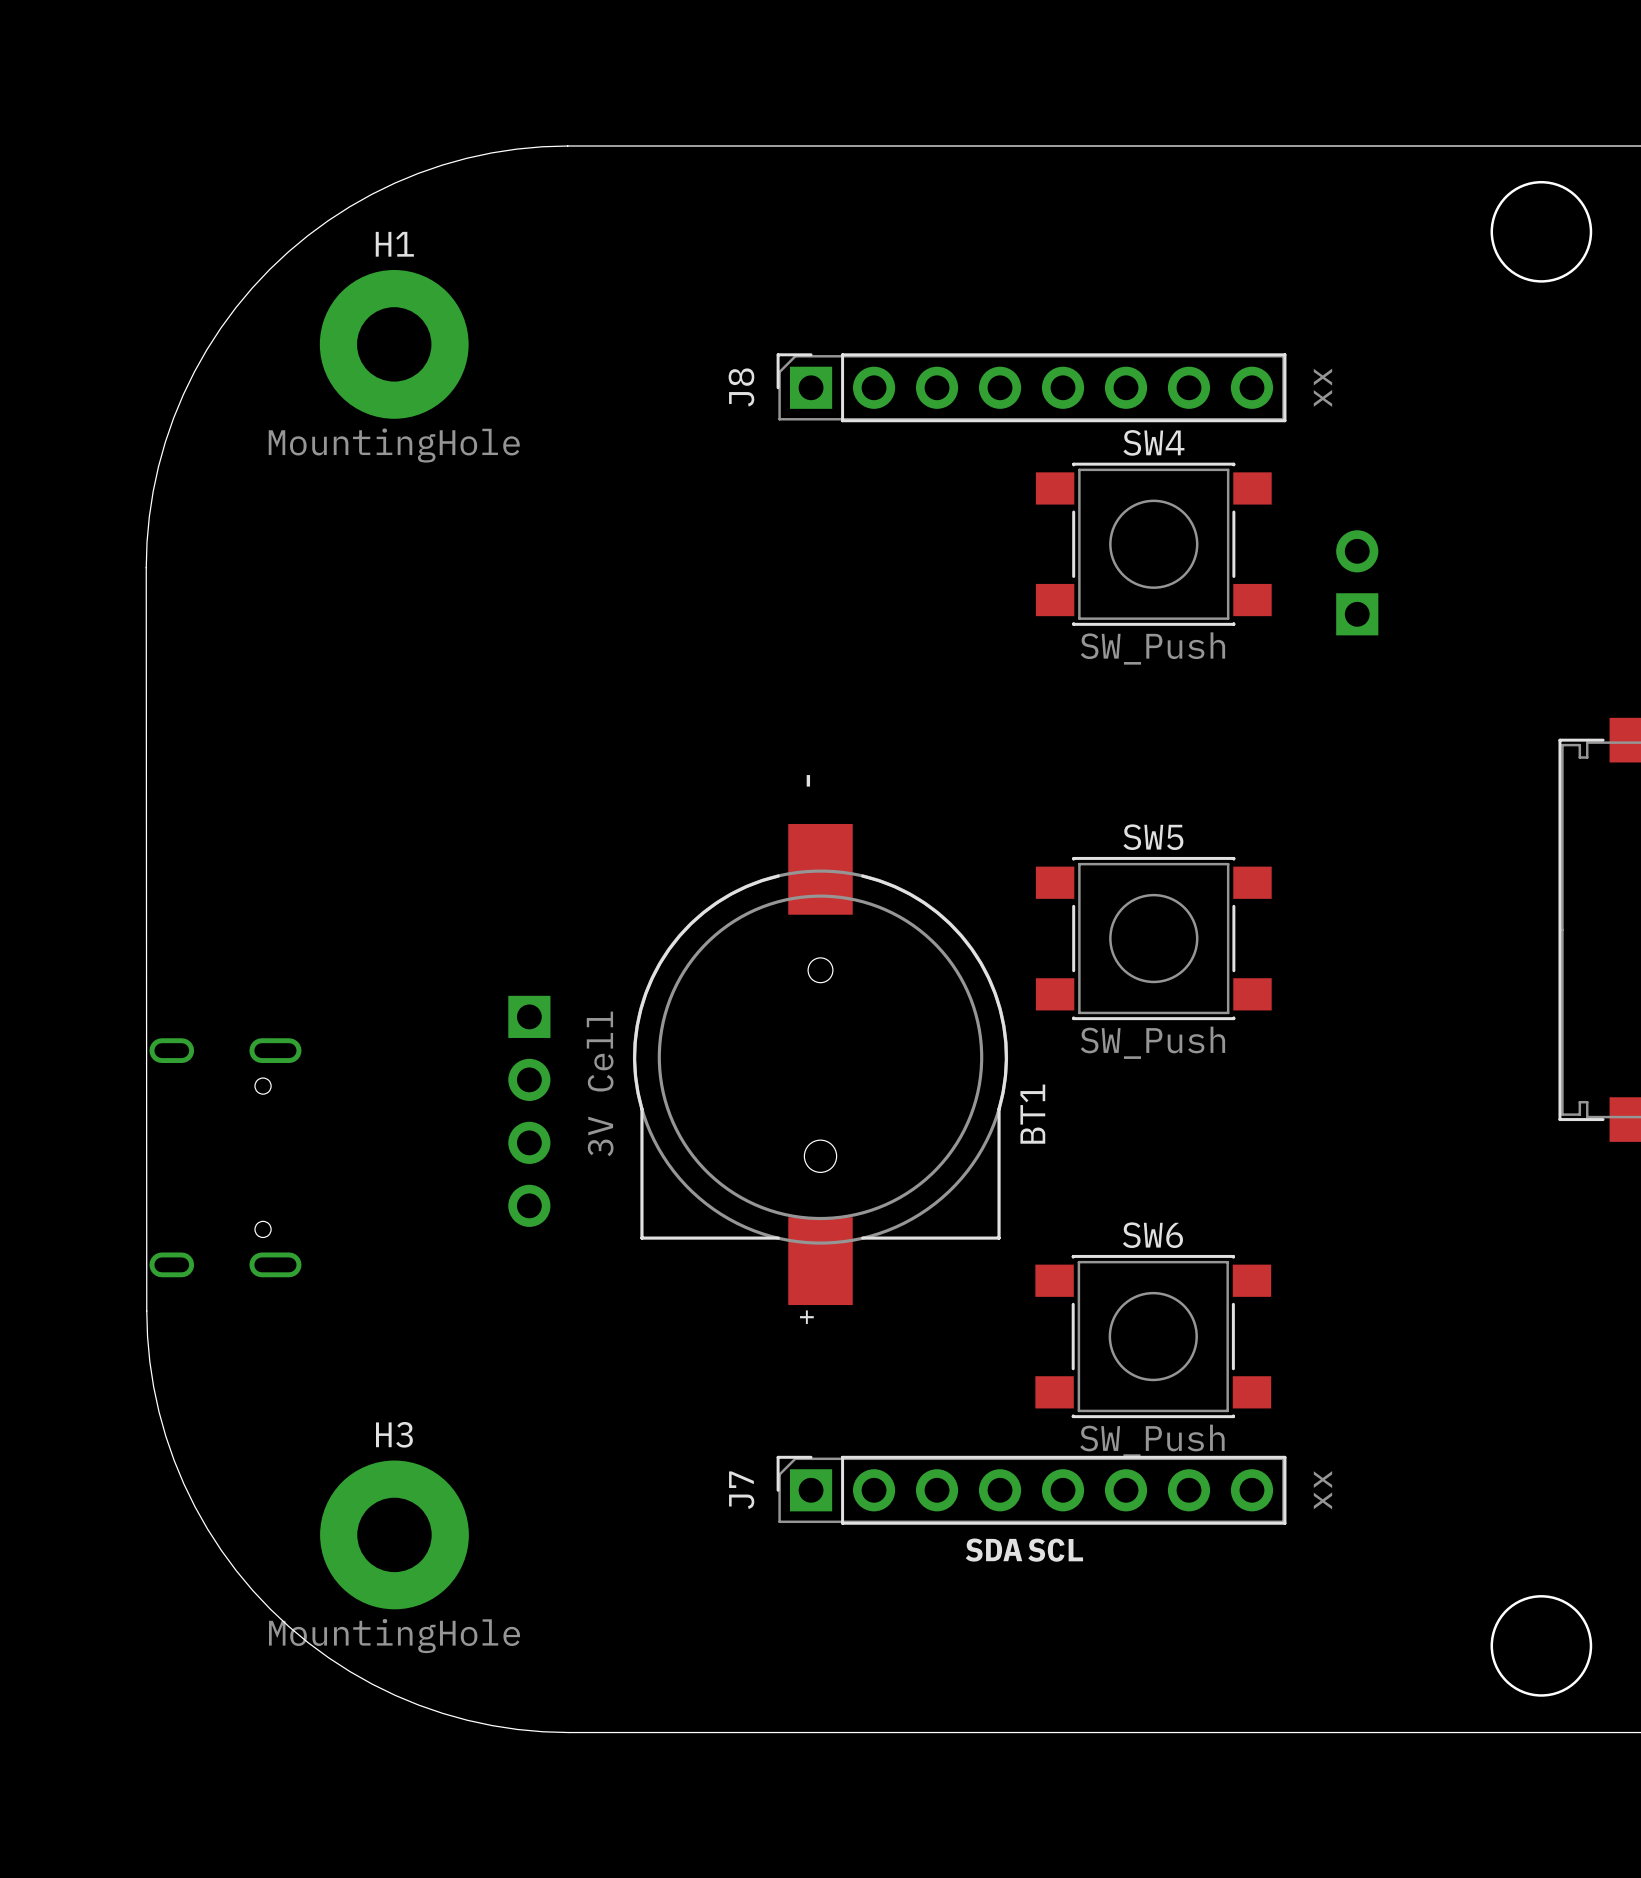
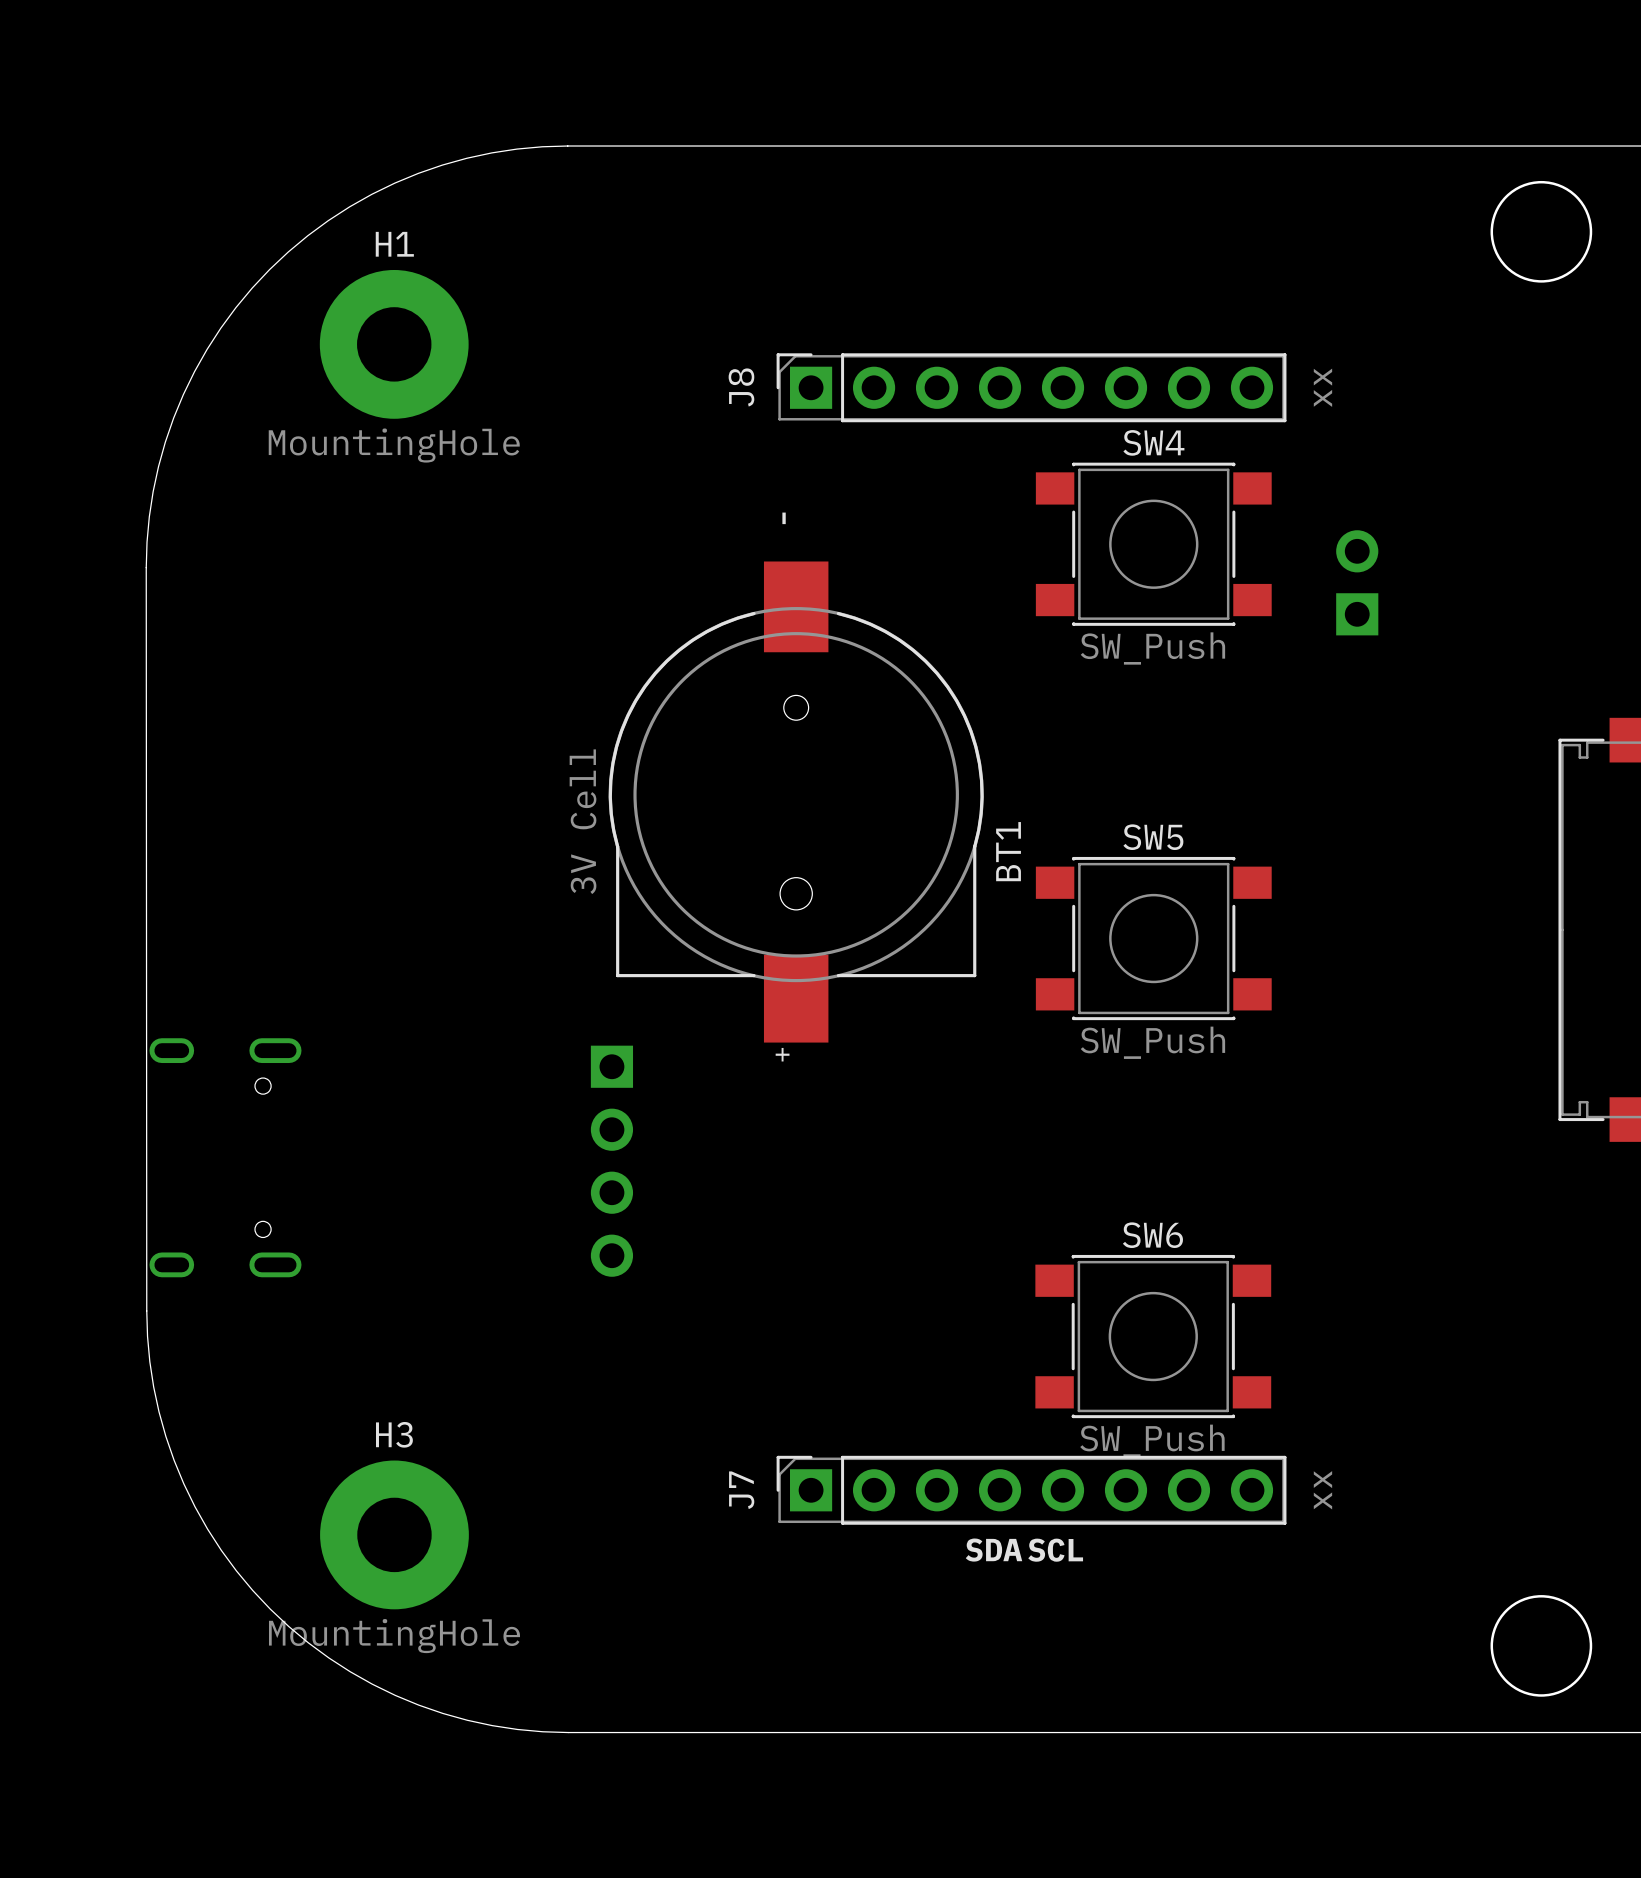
BT1 position: (820, 1064) -> (796, 802)
BT1 value position: 3V Cell (600, 1083) -> 3V Cell (583, 821)
part position: (529, 1111) -> (611, 1161)

